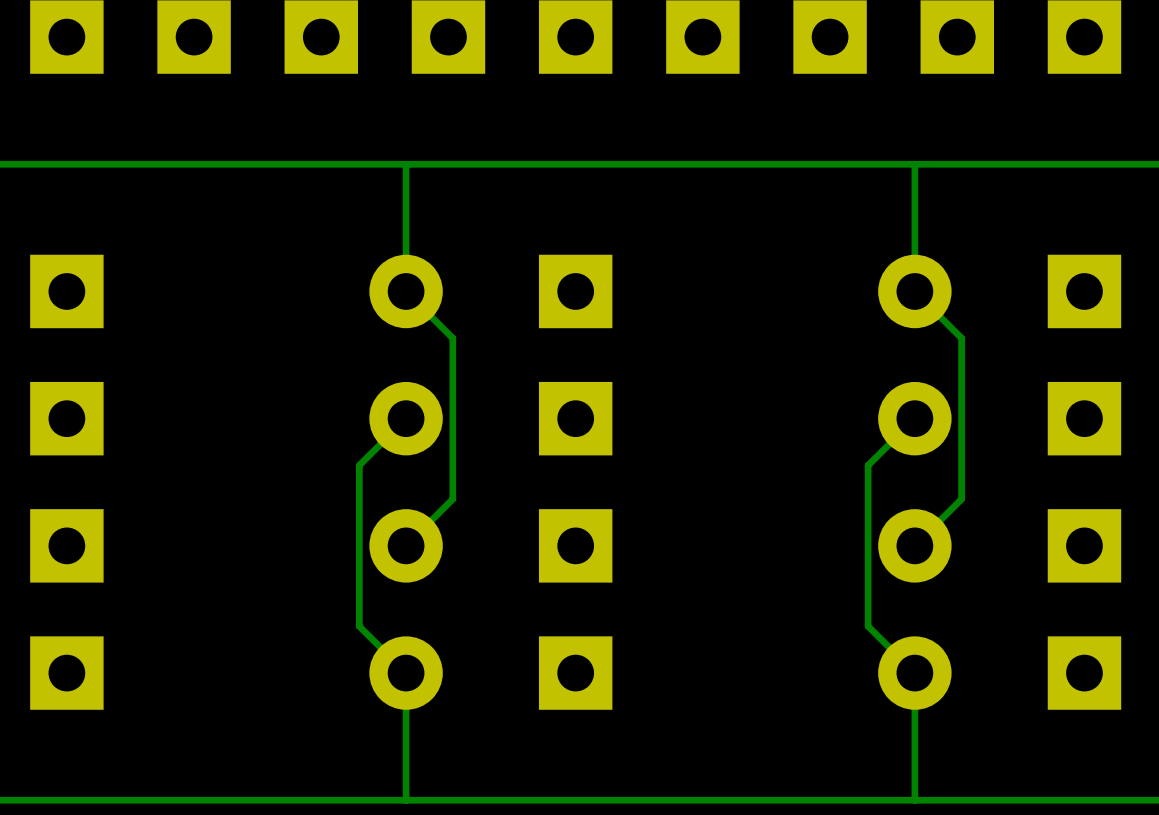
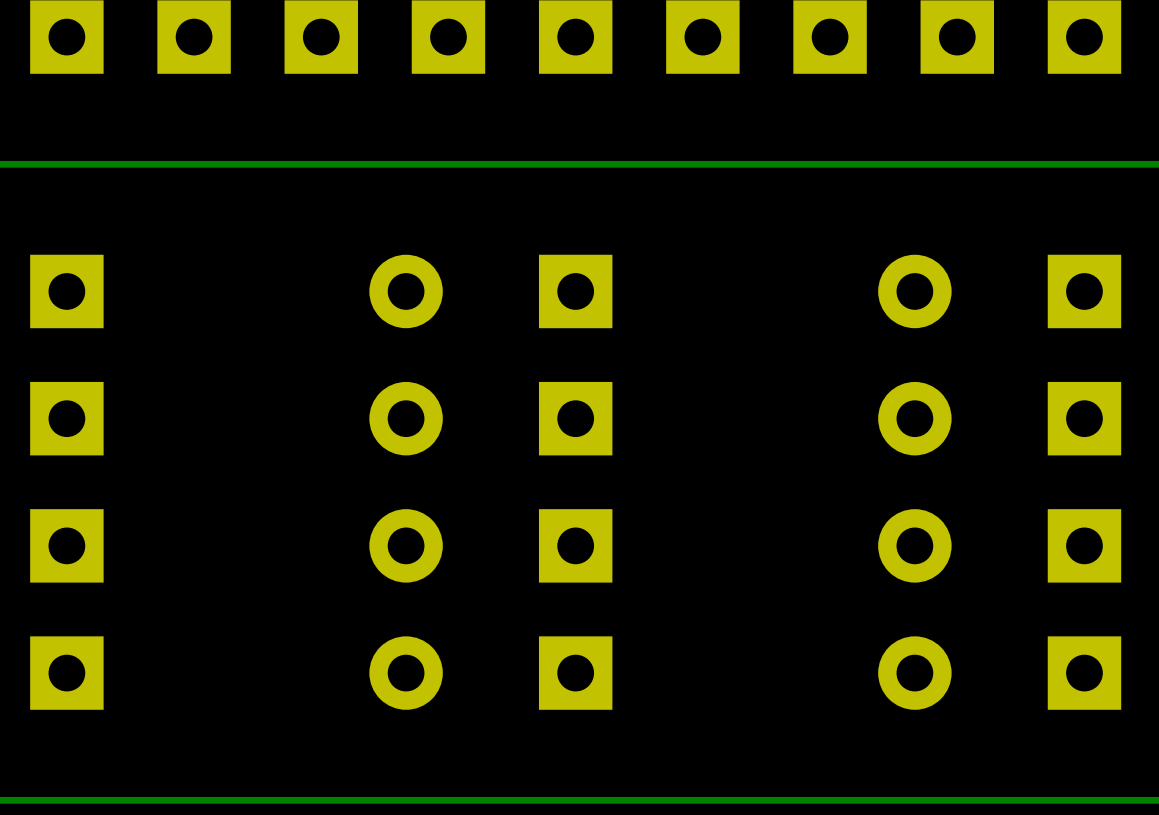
track: (406, 164) (406, 291) (452, 338) (452, 499) (406, 545) -> none
track: (914, 164) (914, 291) (961, 338) (961, 499) (914, 545) -> none
track: (406, 418) (359, 465) (359, 626) (406, 673) (406, 800) -> none
track: (914, 418) (868, 465) (868, 626) (914, 673) (914, 800) -> none

